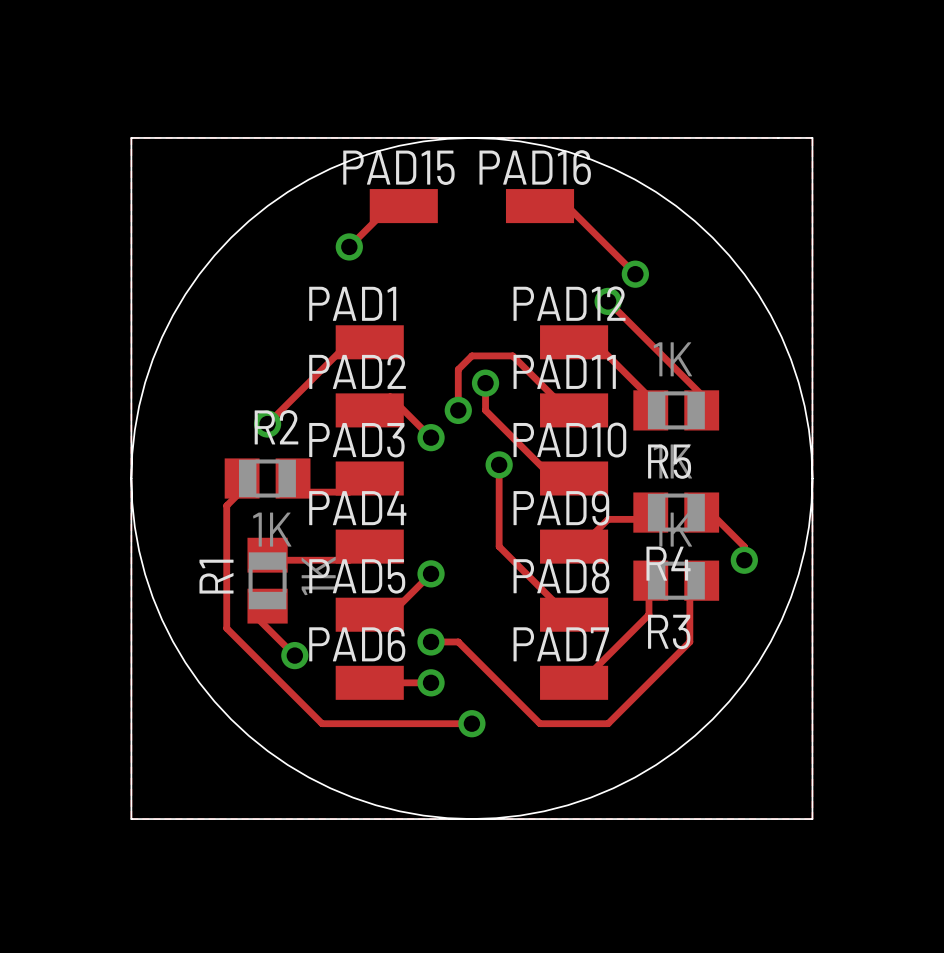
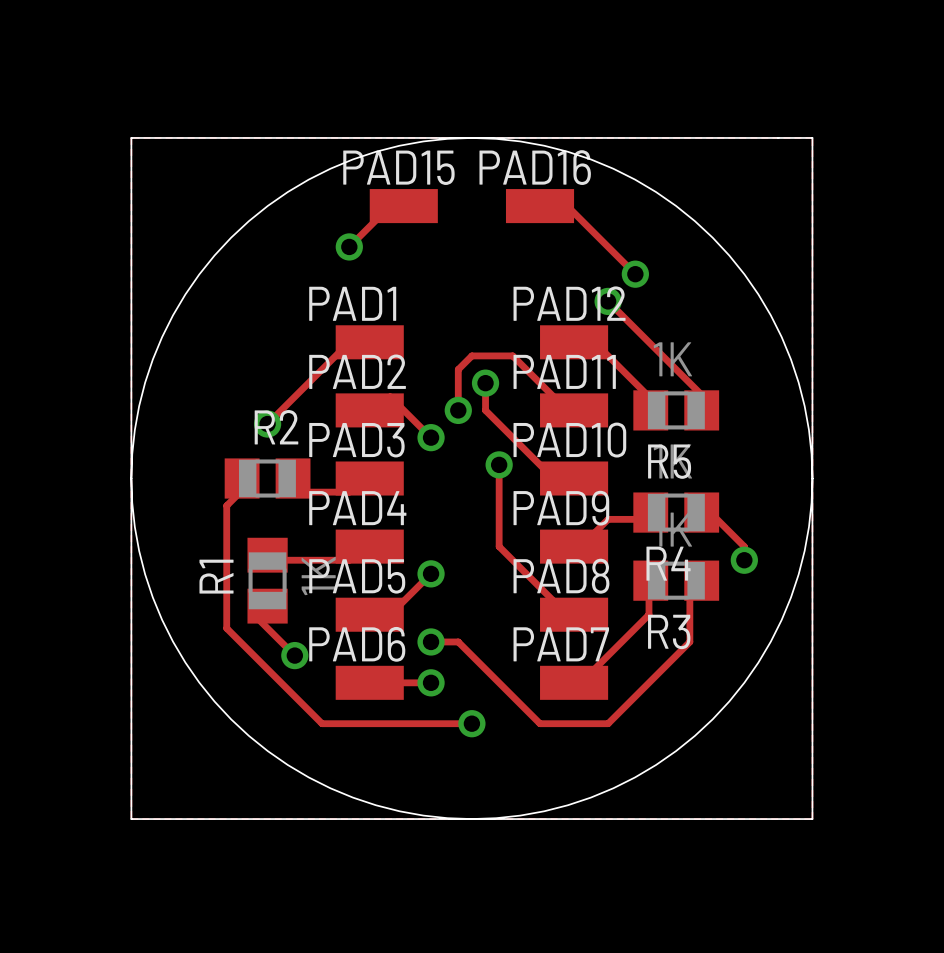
R2 value: 1K (272, 529) -> none

